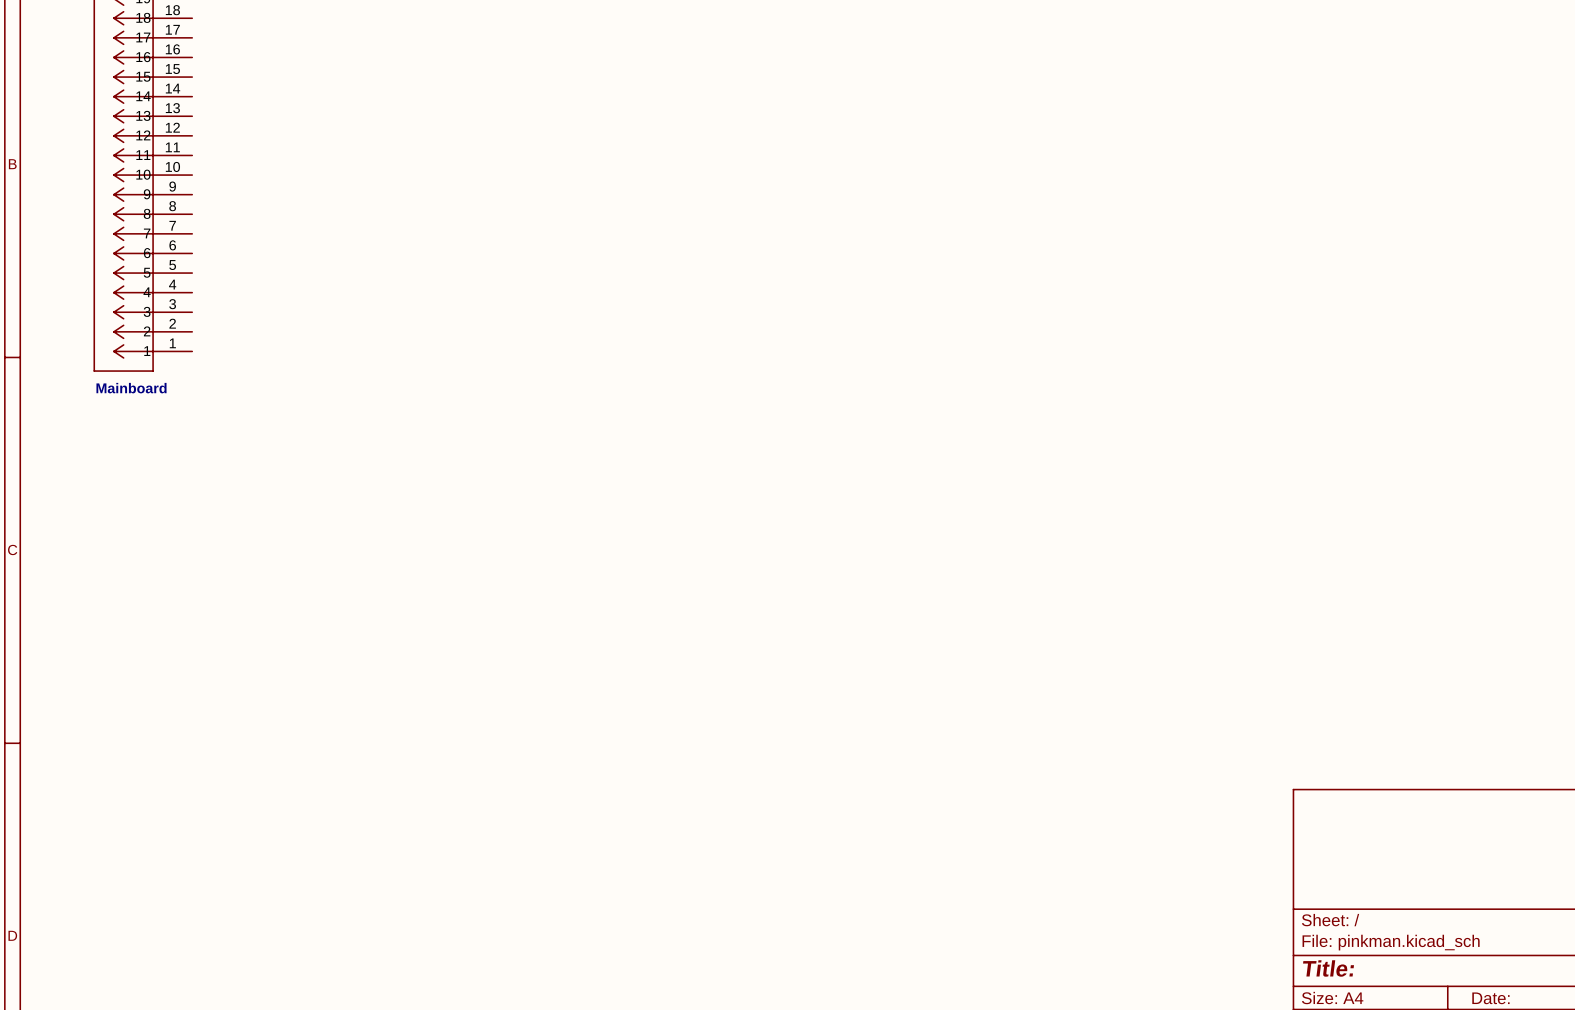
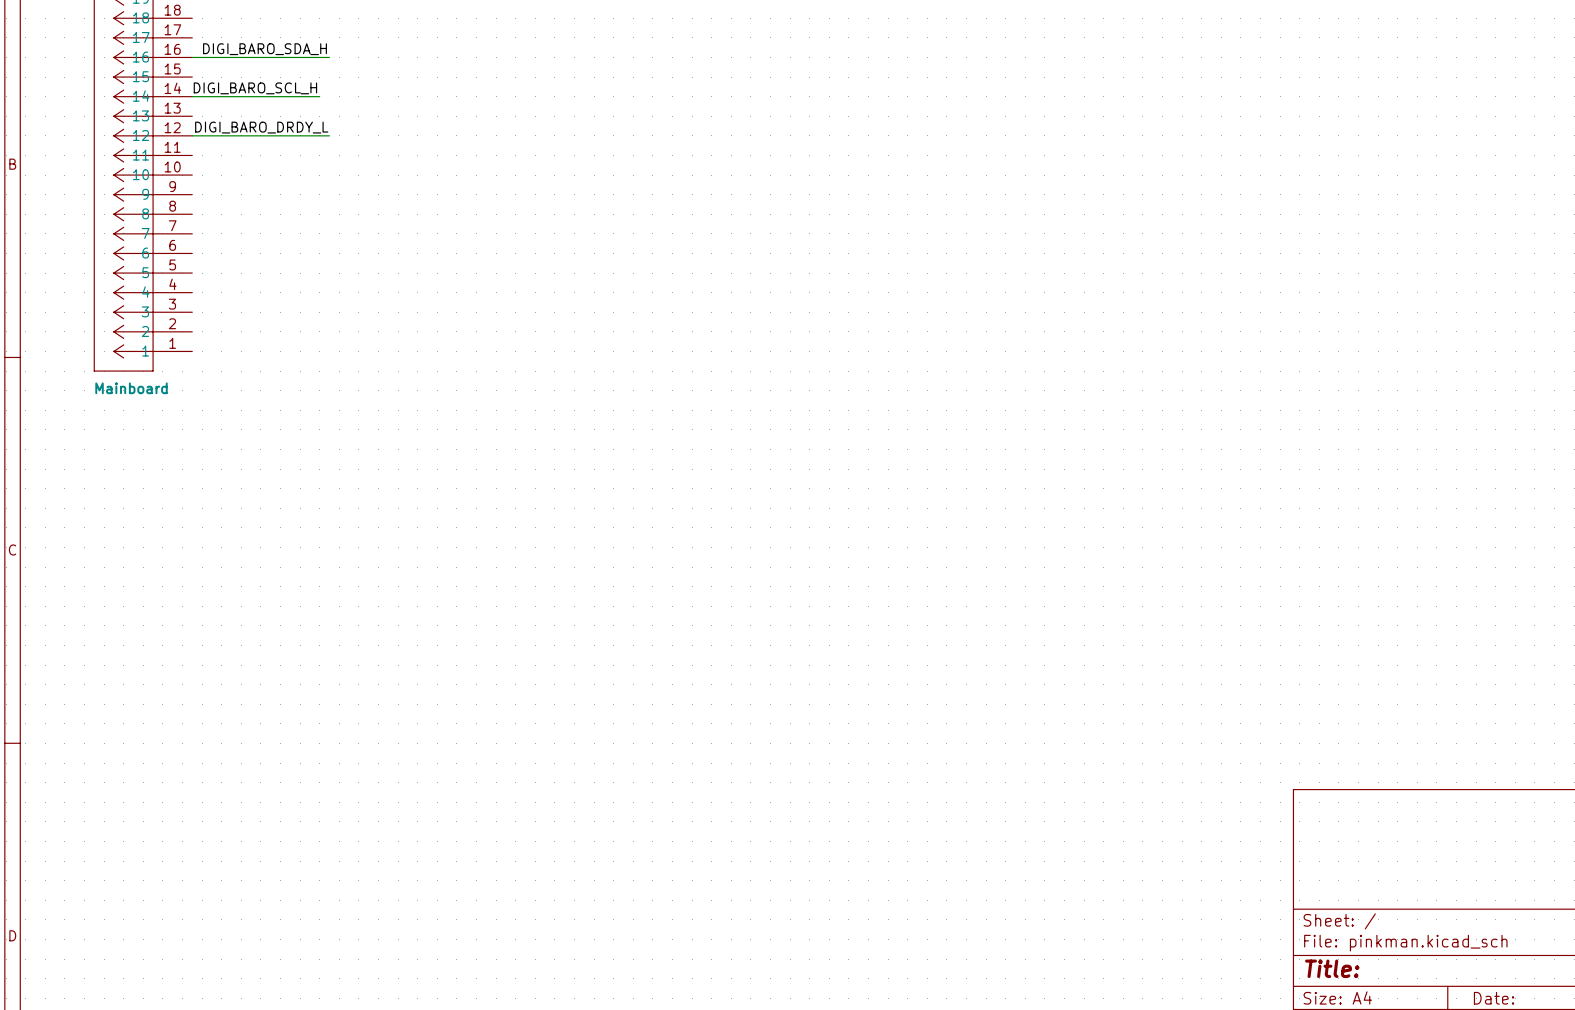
label: none -> DIGI_BARO_SDA_H (264, 49)
wire: none -> (192, 57) (329, 57)
label: none -> DIGI_BARO_SCL_H (255, 88)
wire: none -> (192, 96) (319, 96)
label: none -> DIGI_BARO_DRDY_L (261, 127)
wire: none -> (192, 135) (329, 135)

